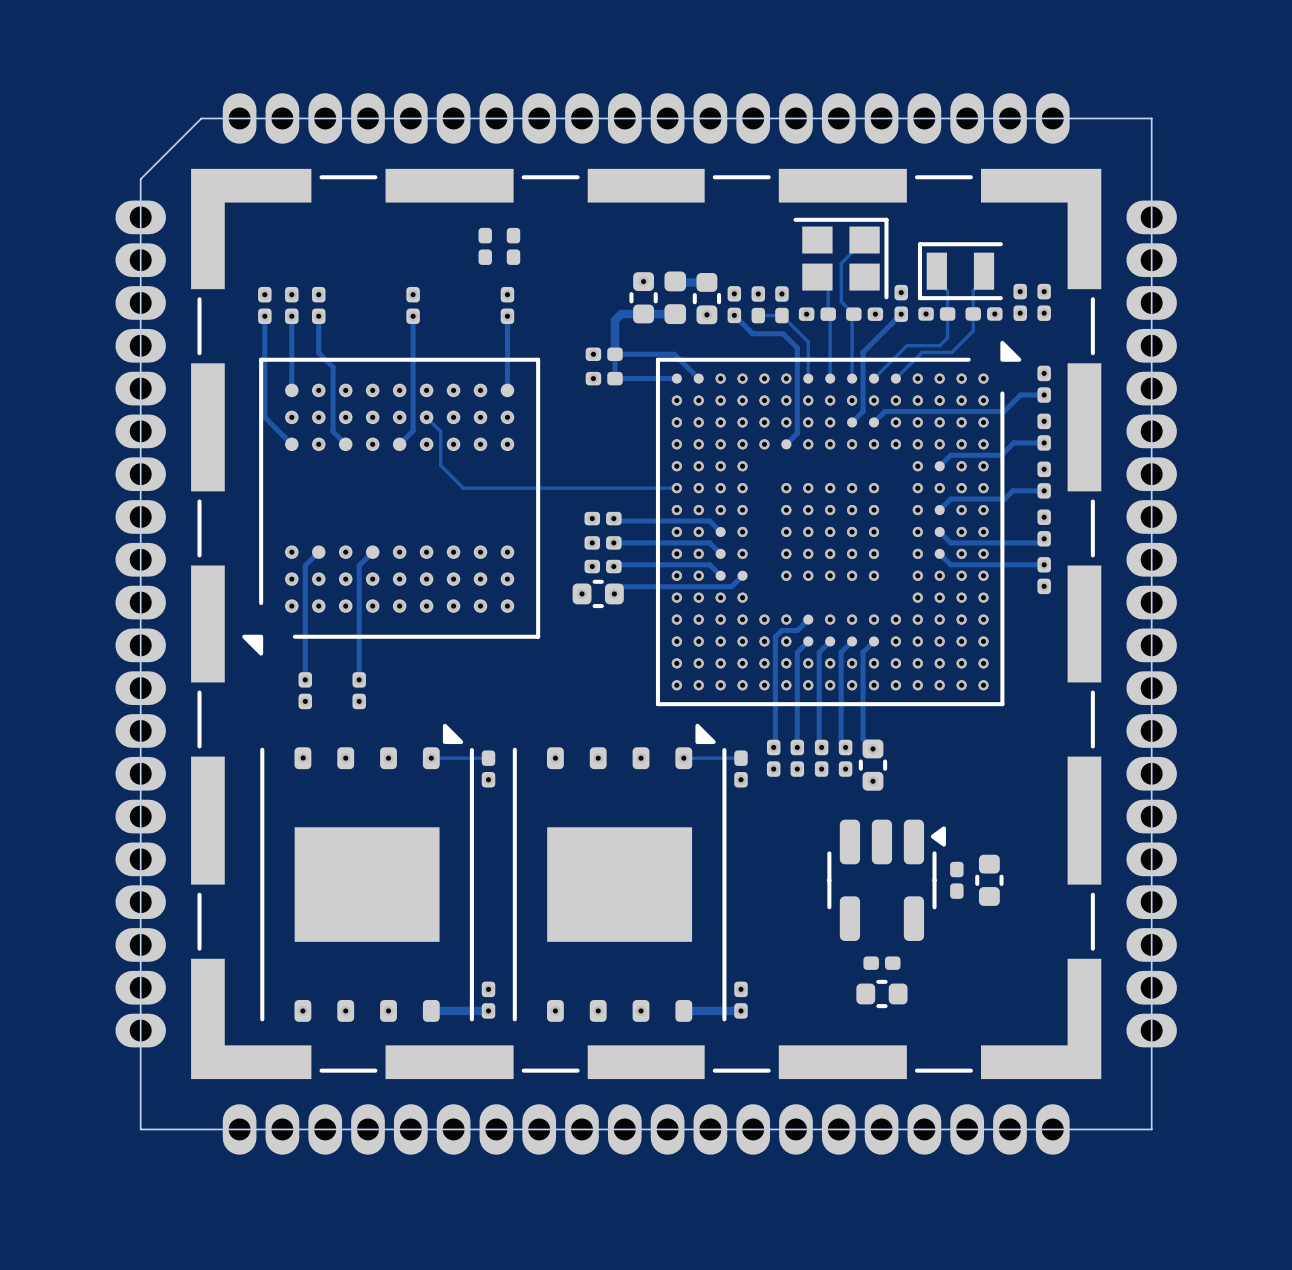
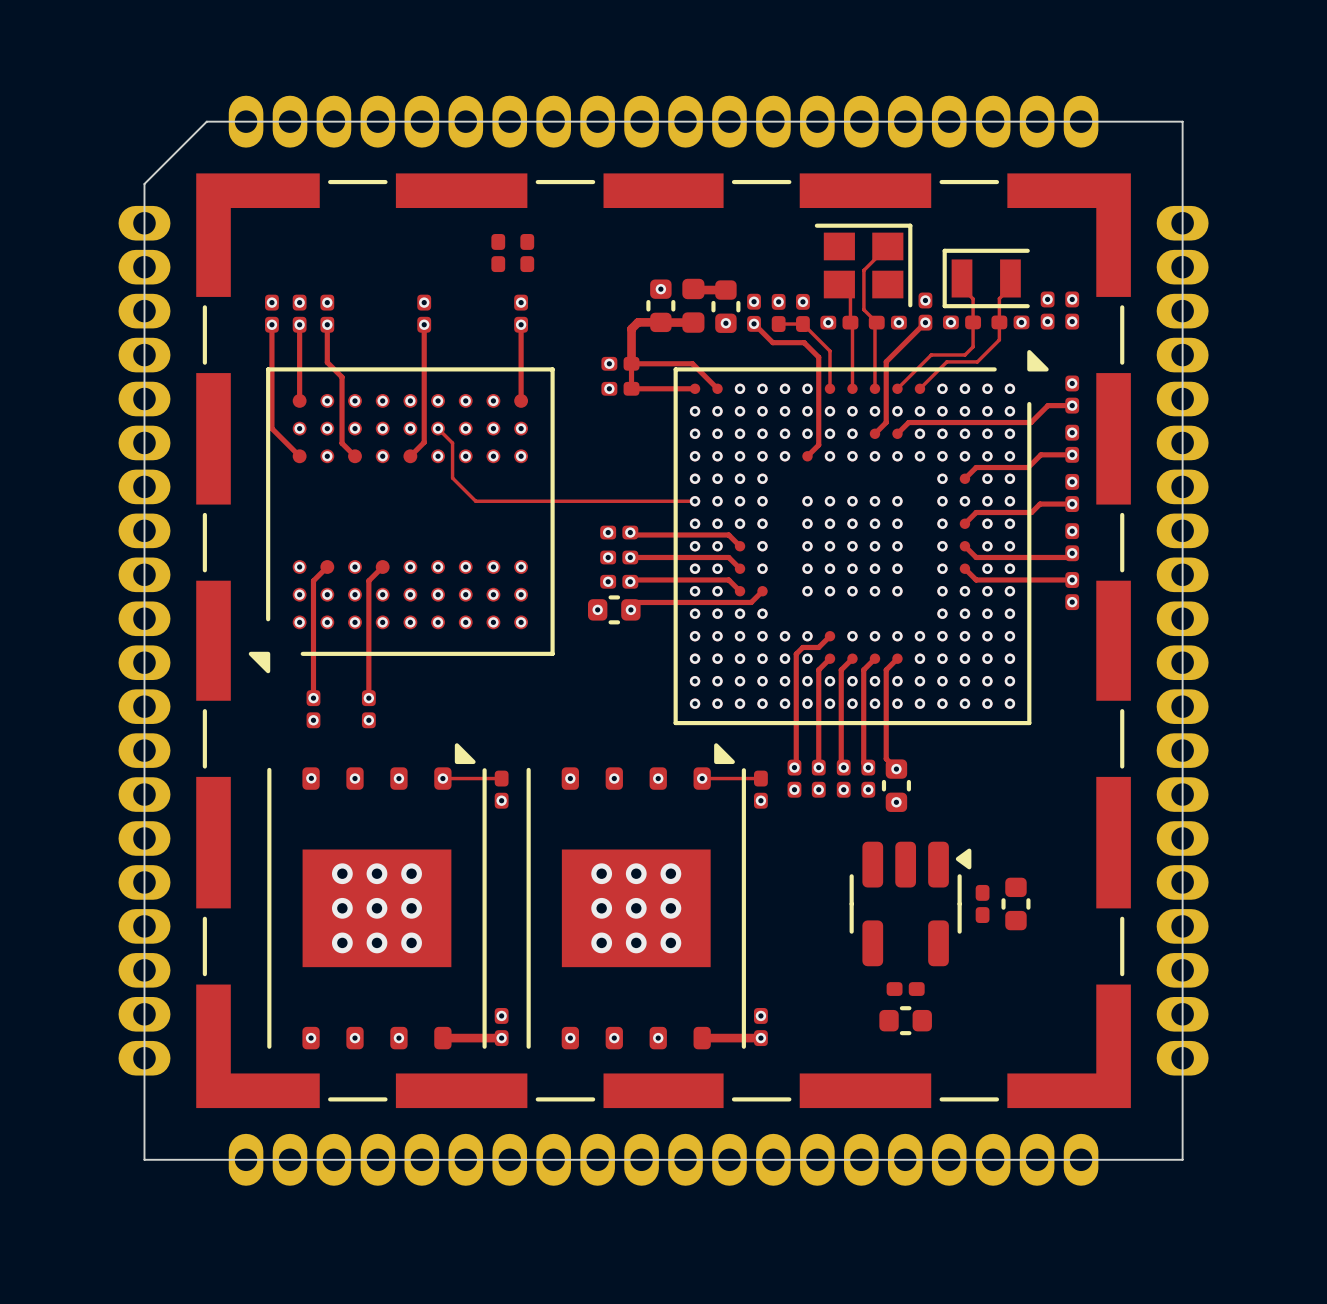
via: none -> (342, 873)
via: none -> (376, 873)
via: none -> (411, 873)
via: none -> (601, 873)
via: none -> (636, 873)
via: none -> (670, 873)
via: none -> (342, 908)
via: none -> (376, 908)
via: none -> (411, 908)
via: none -> (601, 908)
via: none -> (636, 908)
via: none -> (670, 908)
via: none -> (342, 942)
via: none -> (376, 942)
via: none -> (411, 942)
via: none -> (601, 942)
via: none -> (636, 942)
via: none -> (670, 942)

